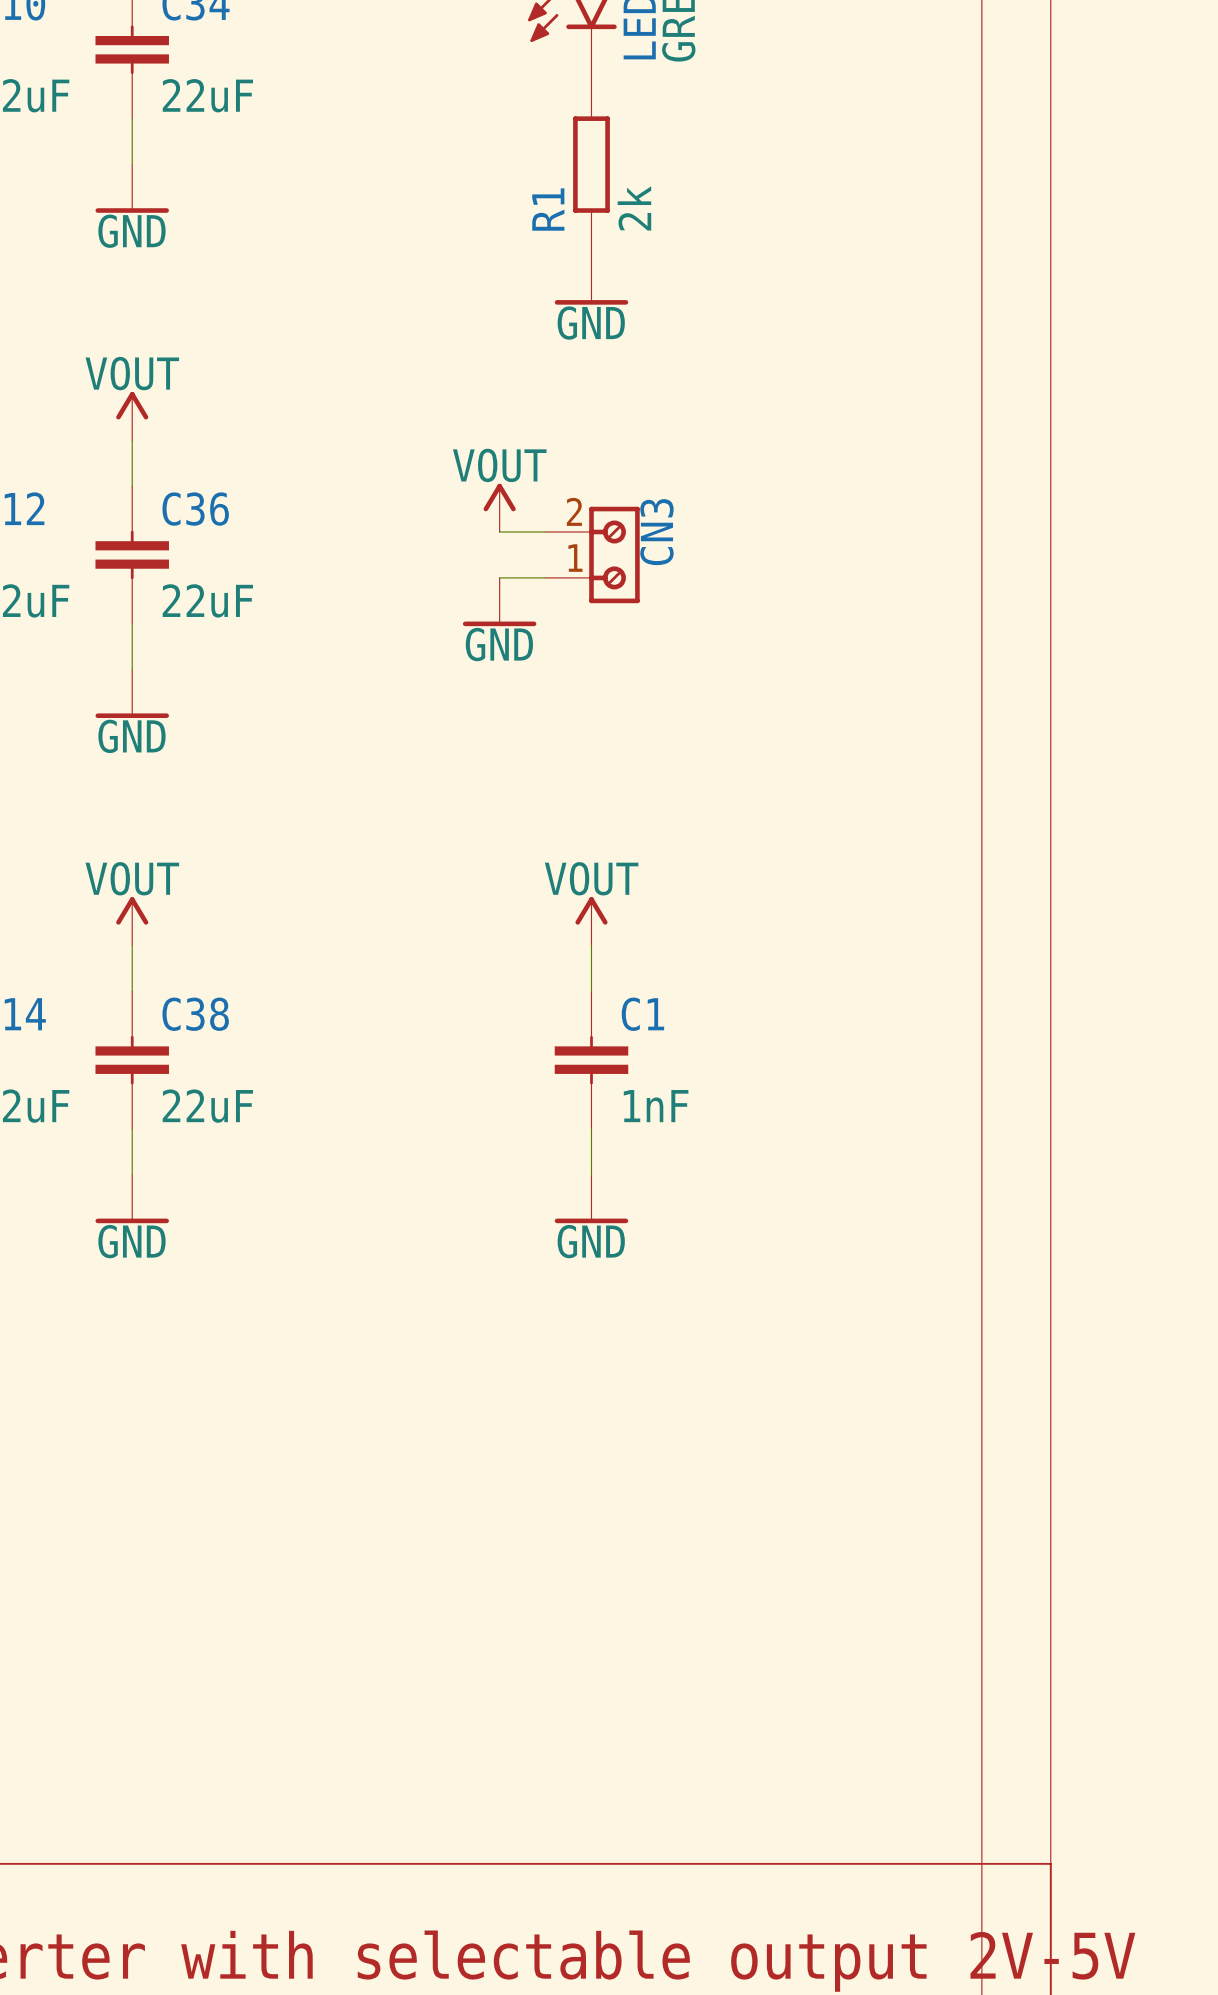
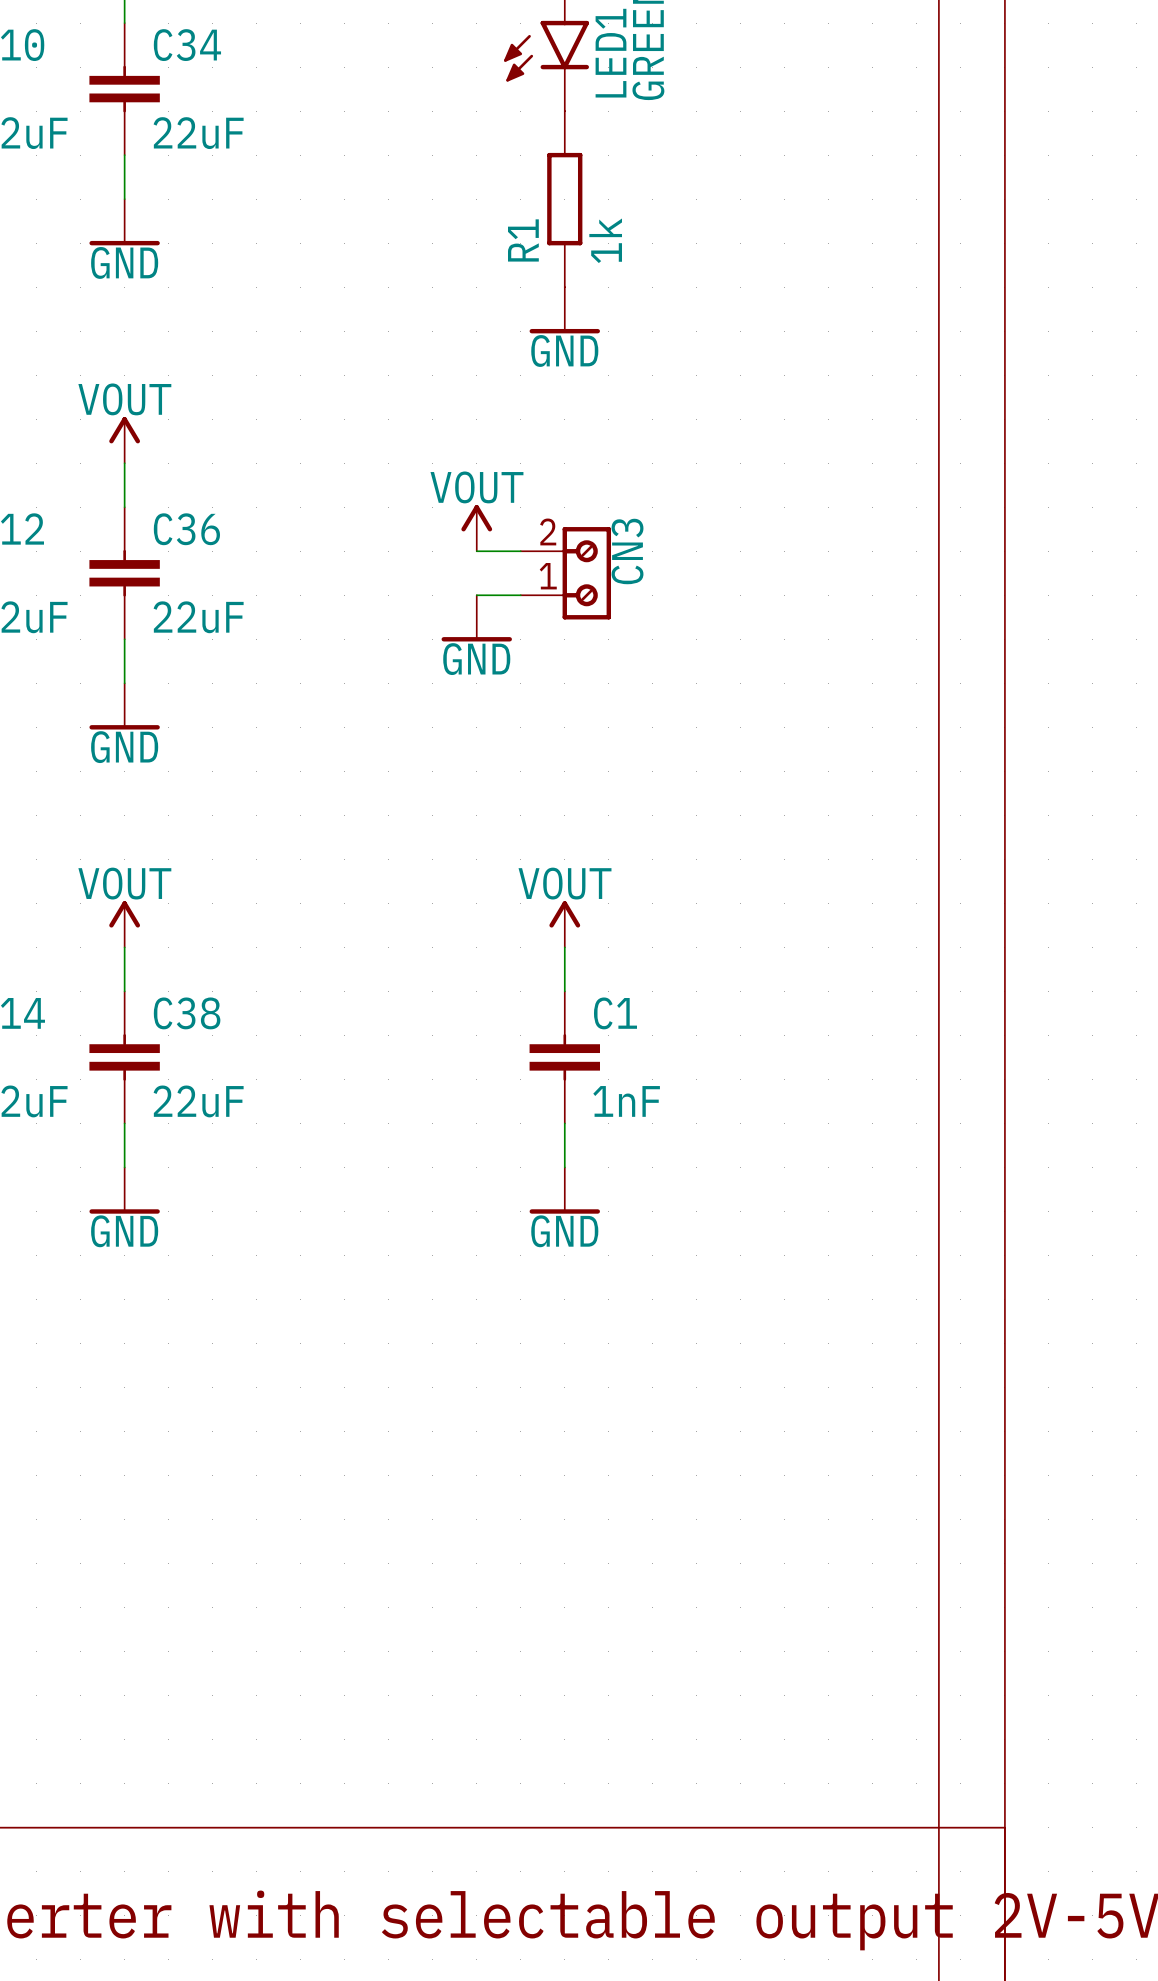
R1 value: 2k (634, 208) -> 1k (605, 240)

